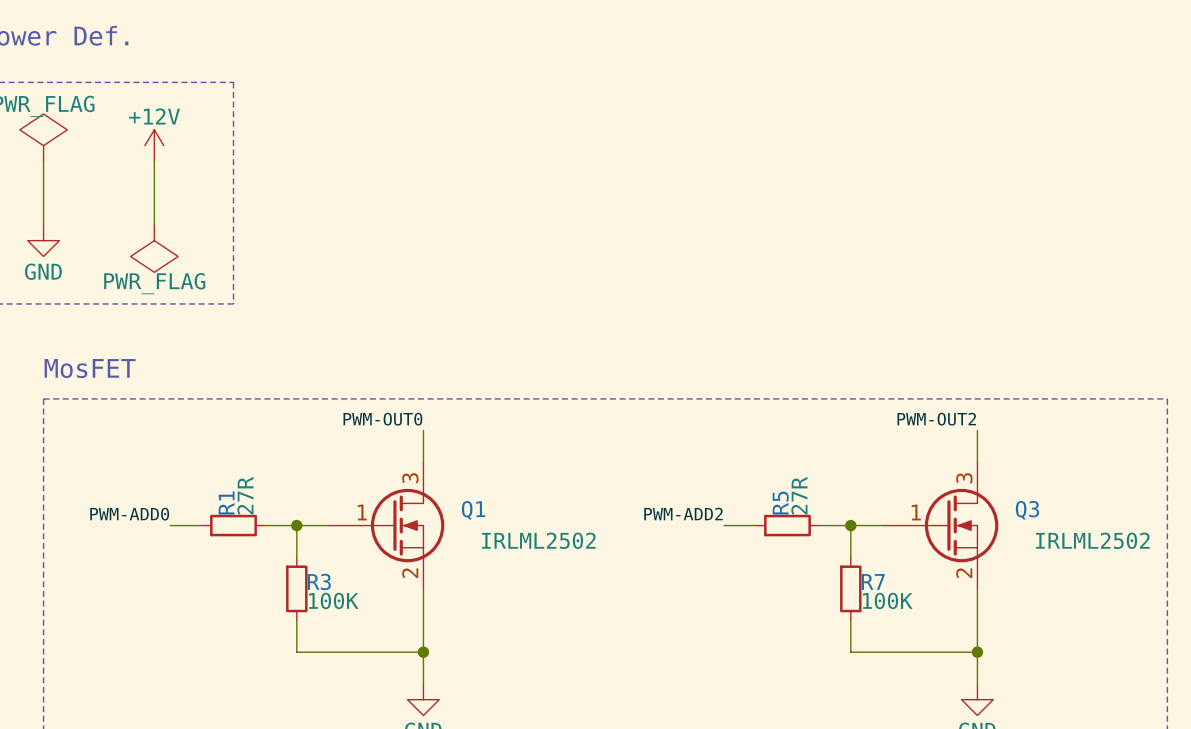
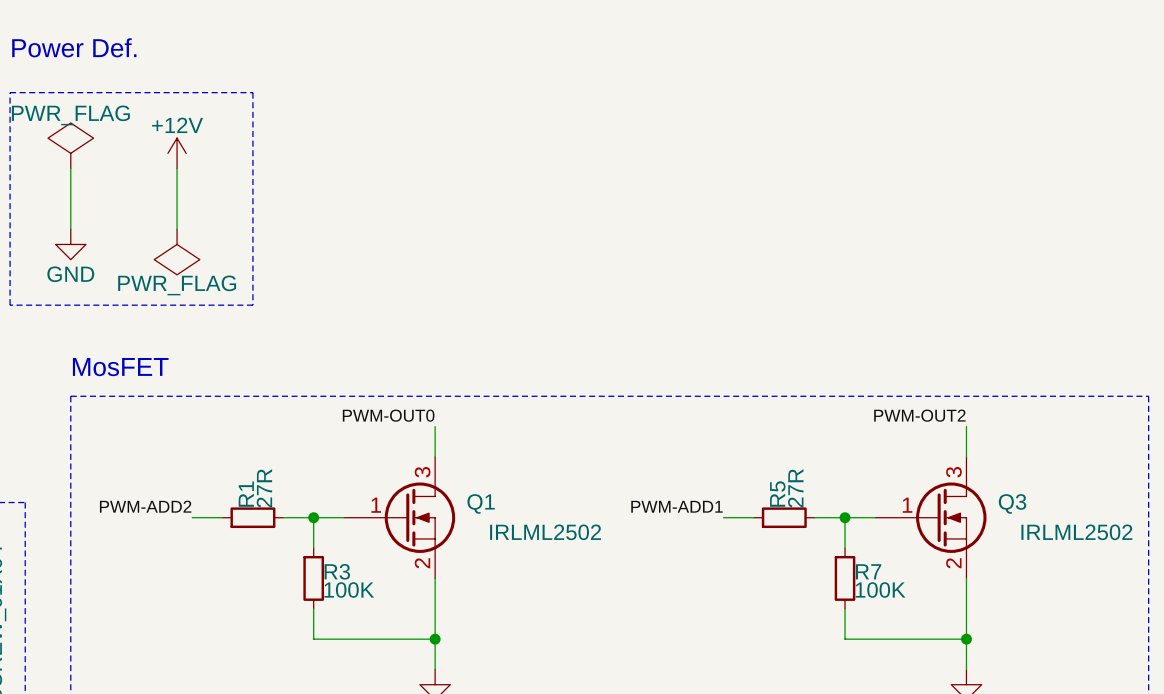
label: PWM-ADD0 (129, 514) -> PWM-ADD2 (145, 506)
label: PWM-ADD2 (683, 514) -> PWM-ADD1 (677, 506)

